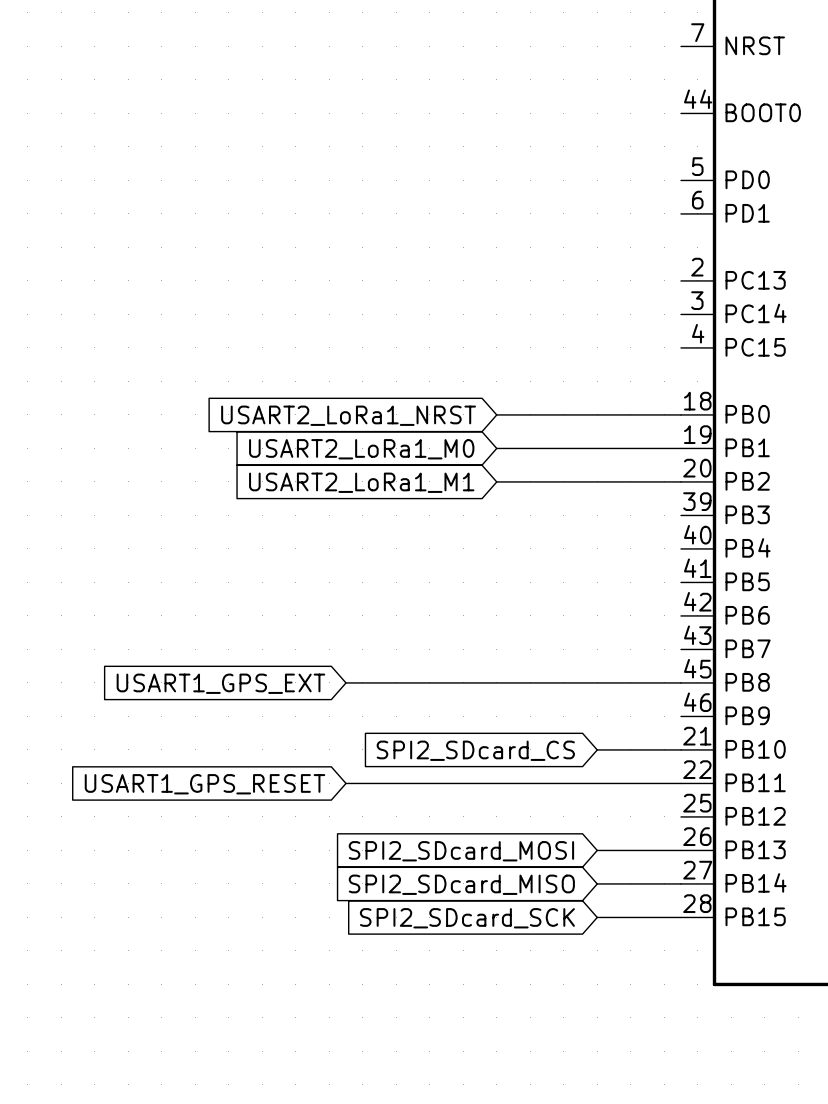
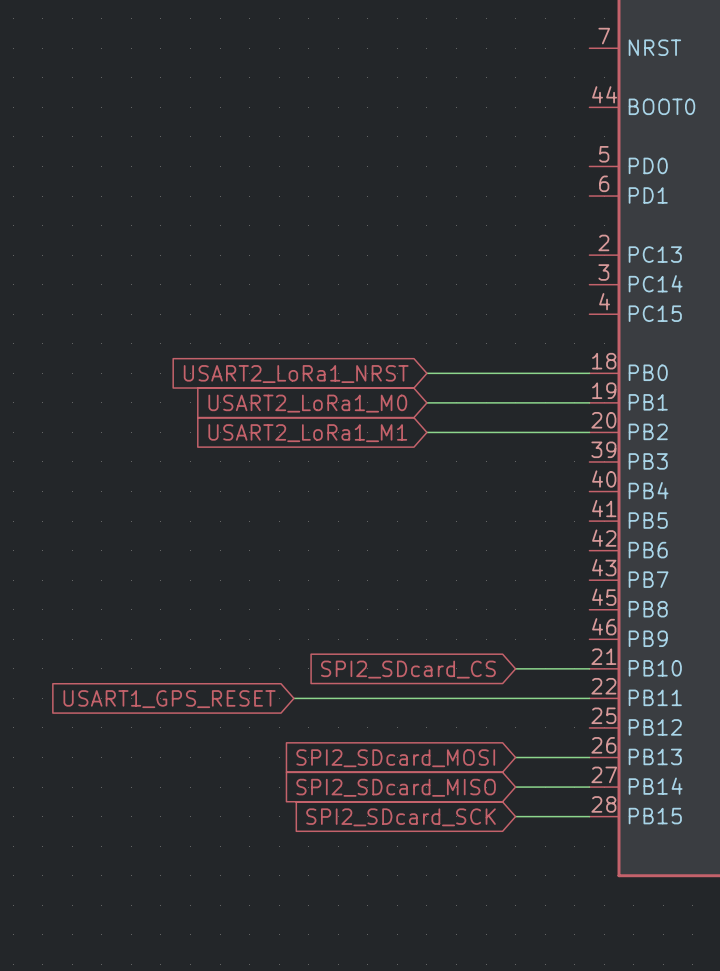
wire: (346, 682) (681, 682) -> none
global label: USART1_GPS_EXT (220, 683) -> none

